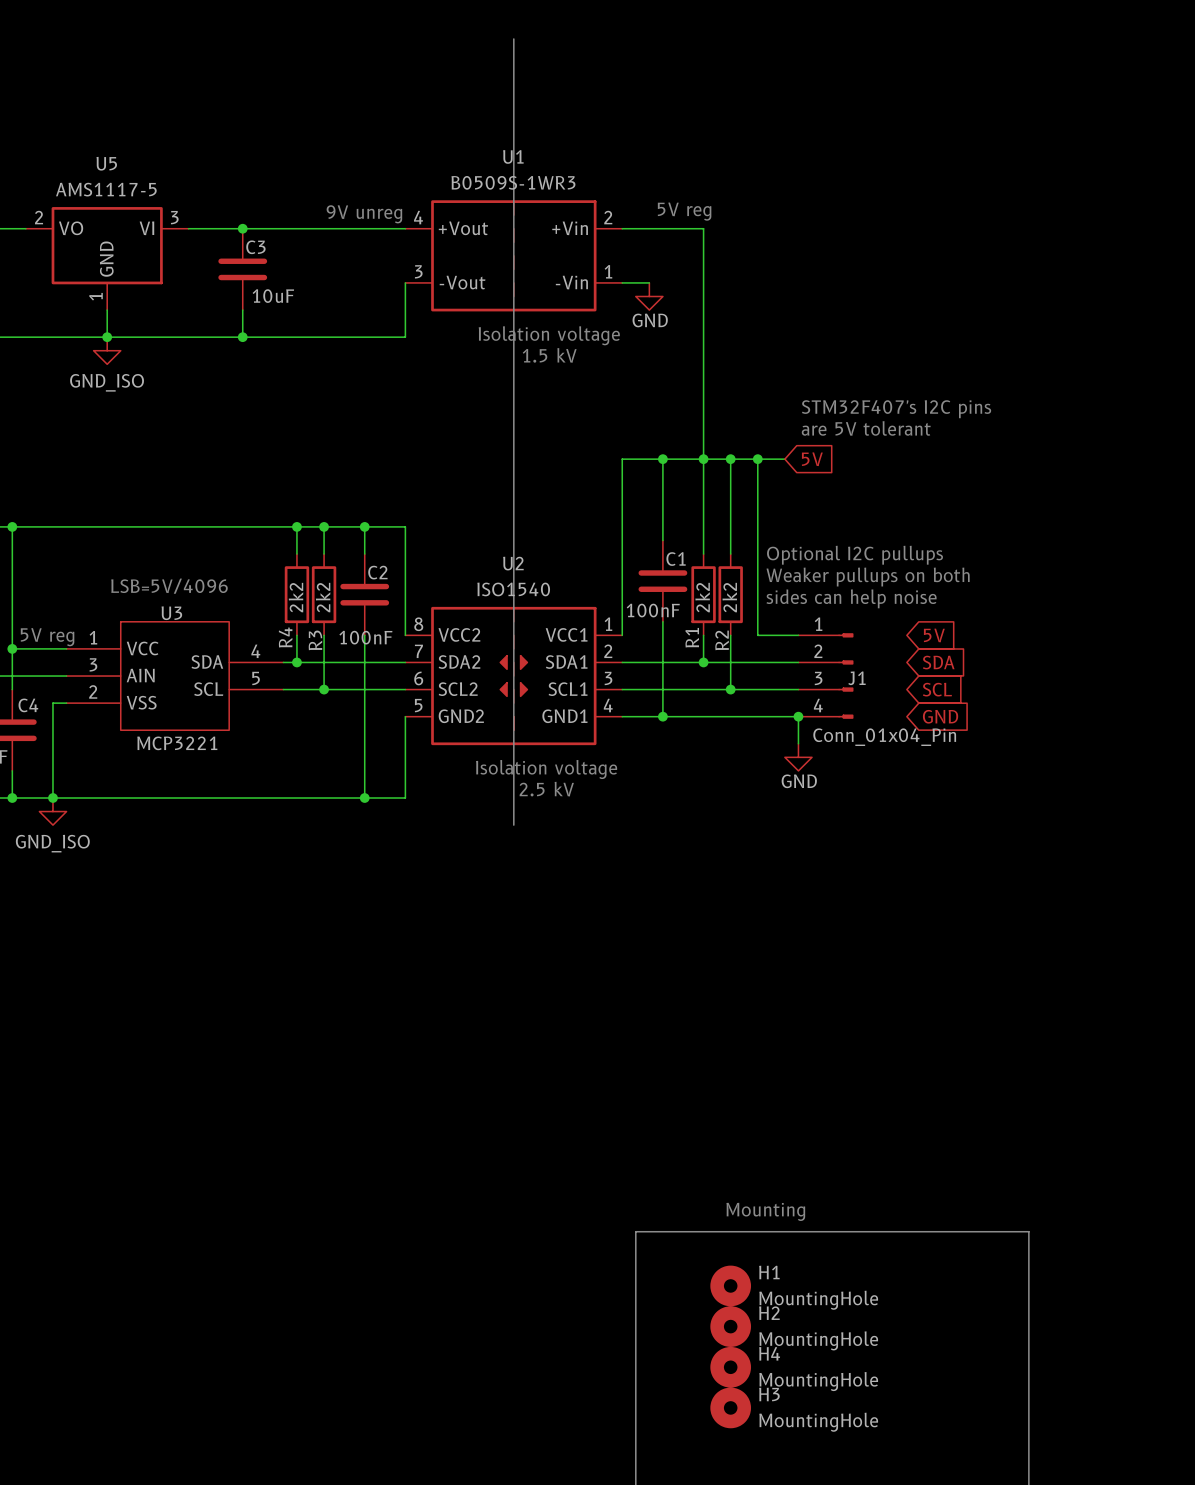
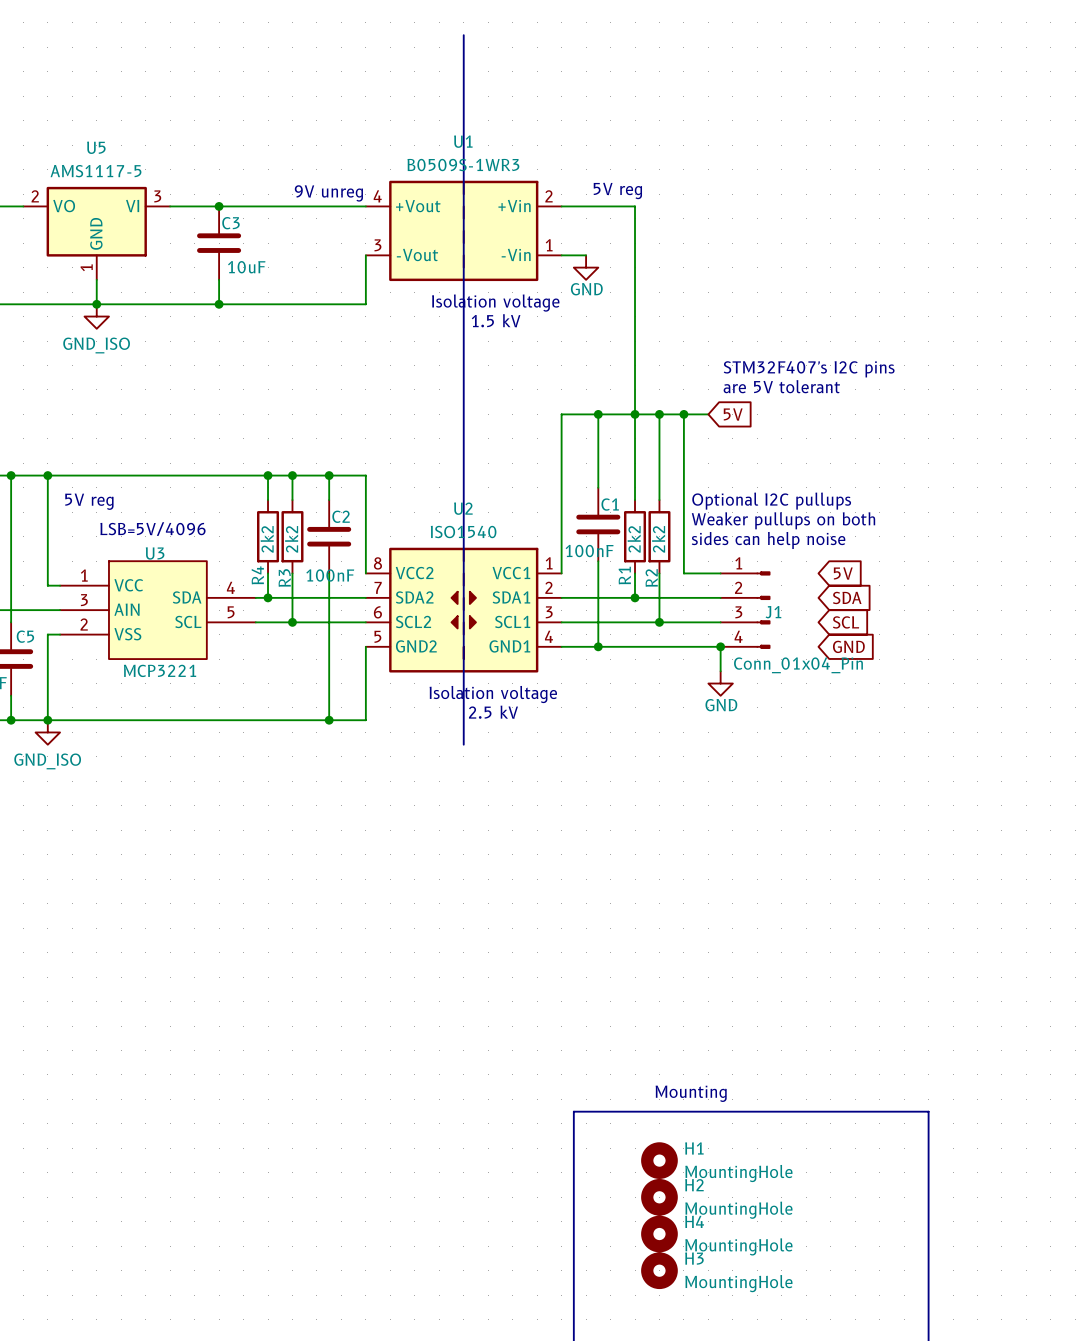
junction: none -> (47, 475)
text position: 5V reg (47, 637) -> 5V reg (89, 501)
wire: (12, 648) (52, 648) -> (47, 475) (47, 585)
junction: (12, 648) -> none
C4 name: C4 (28, 705) -> C5 (25, 636)

